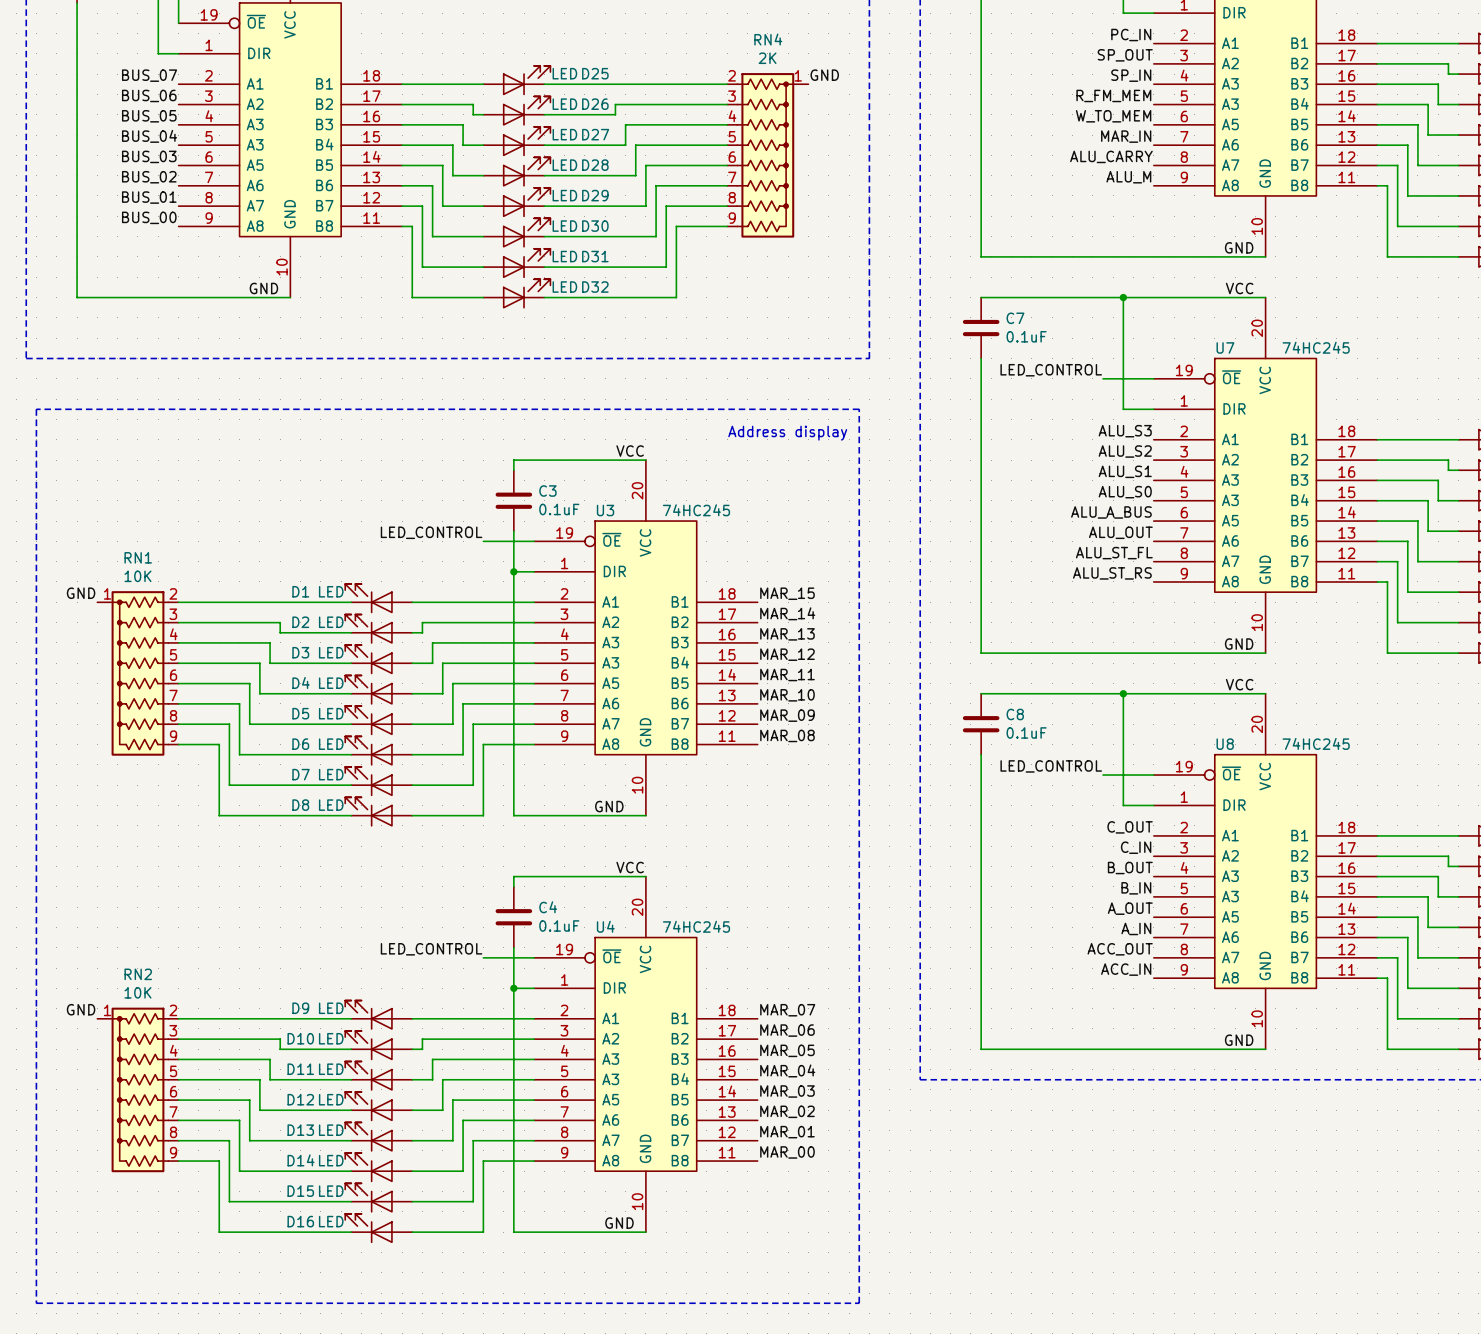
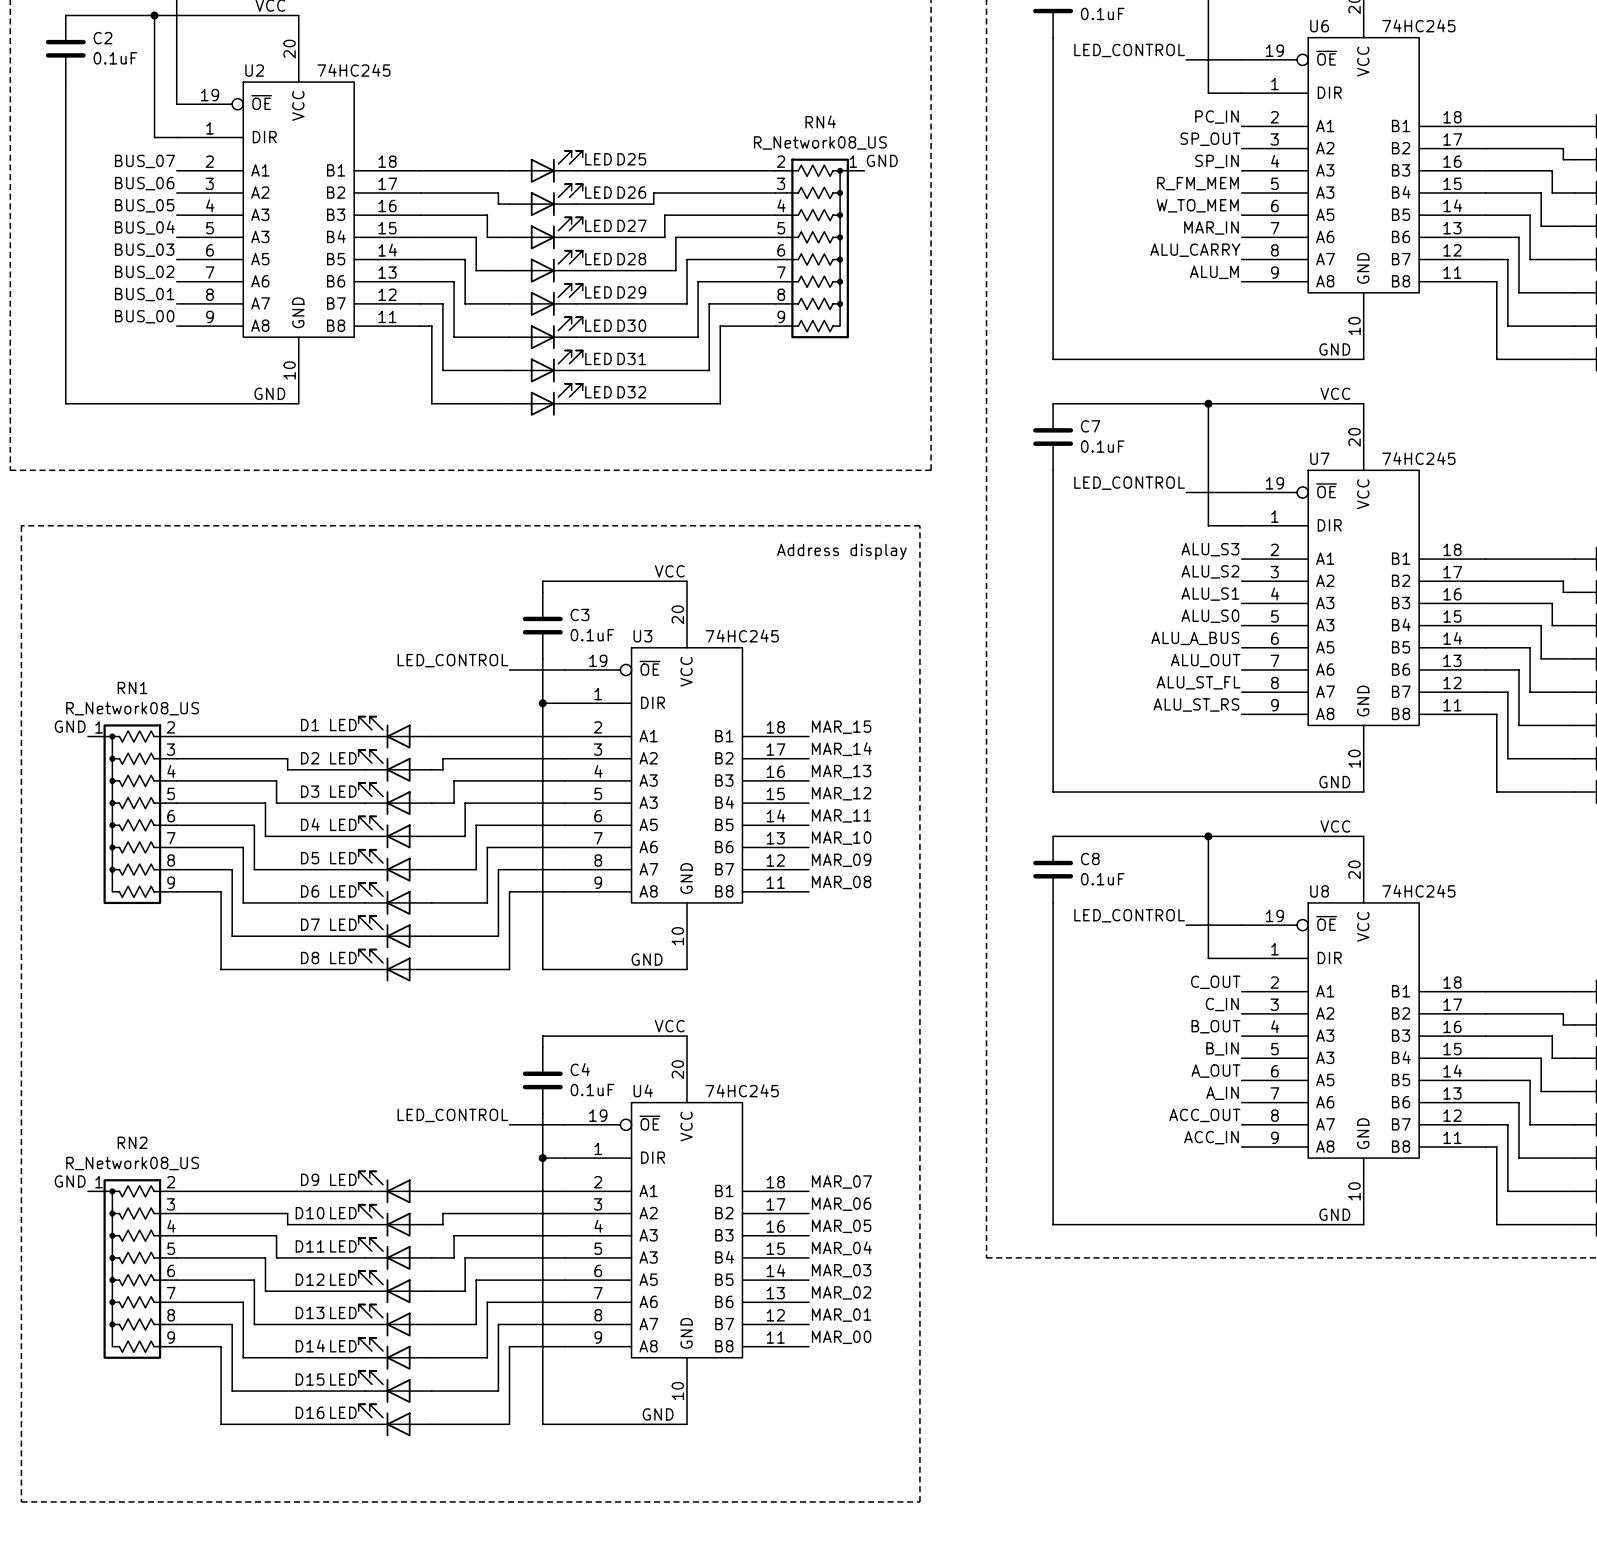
RN4 value: 2K (767, 58) -> R_Network08_US (820, 142)
RN1 value: 10K (137, 576) -> R_Network08_US (132, 708)
RN2 value: 10K (137, 992) -> R_Network08_US (132, 1163)

